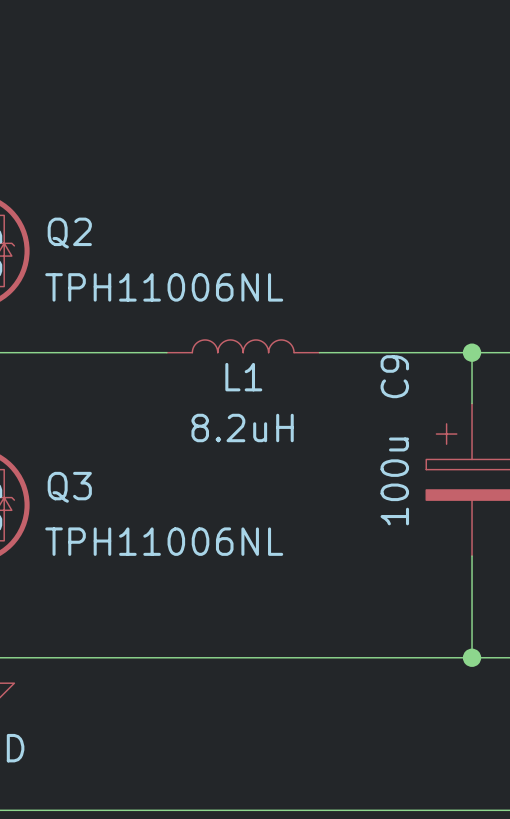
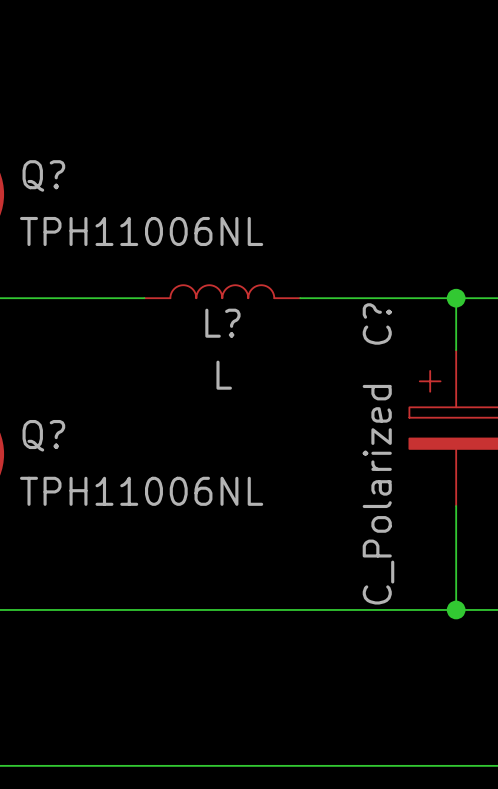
Q2 name: Q2 (69, 233) -> Q? (43, 175)
C9 name: C9 (394, 376) -> C? (377, 323)
L1 name: L1 (243, 377) -> L? (222, 323)
L1 value: 8.2uH (242, 427) -> L (224, 375)
C9 value: 100u (394, 481) -> C_Polarized (378, 494)
Q3 name: Q3 (69, 487) -> Q? (43, 435)

